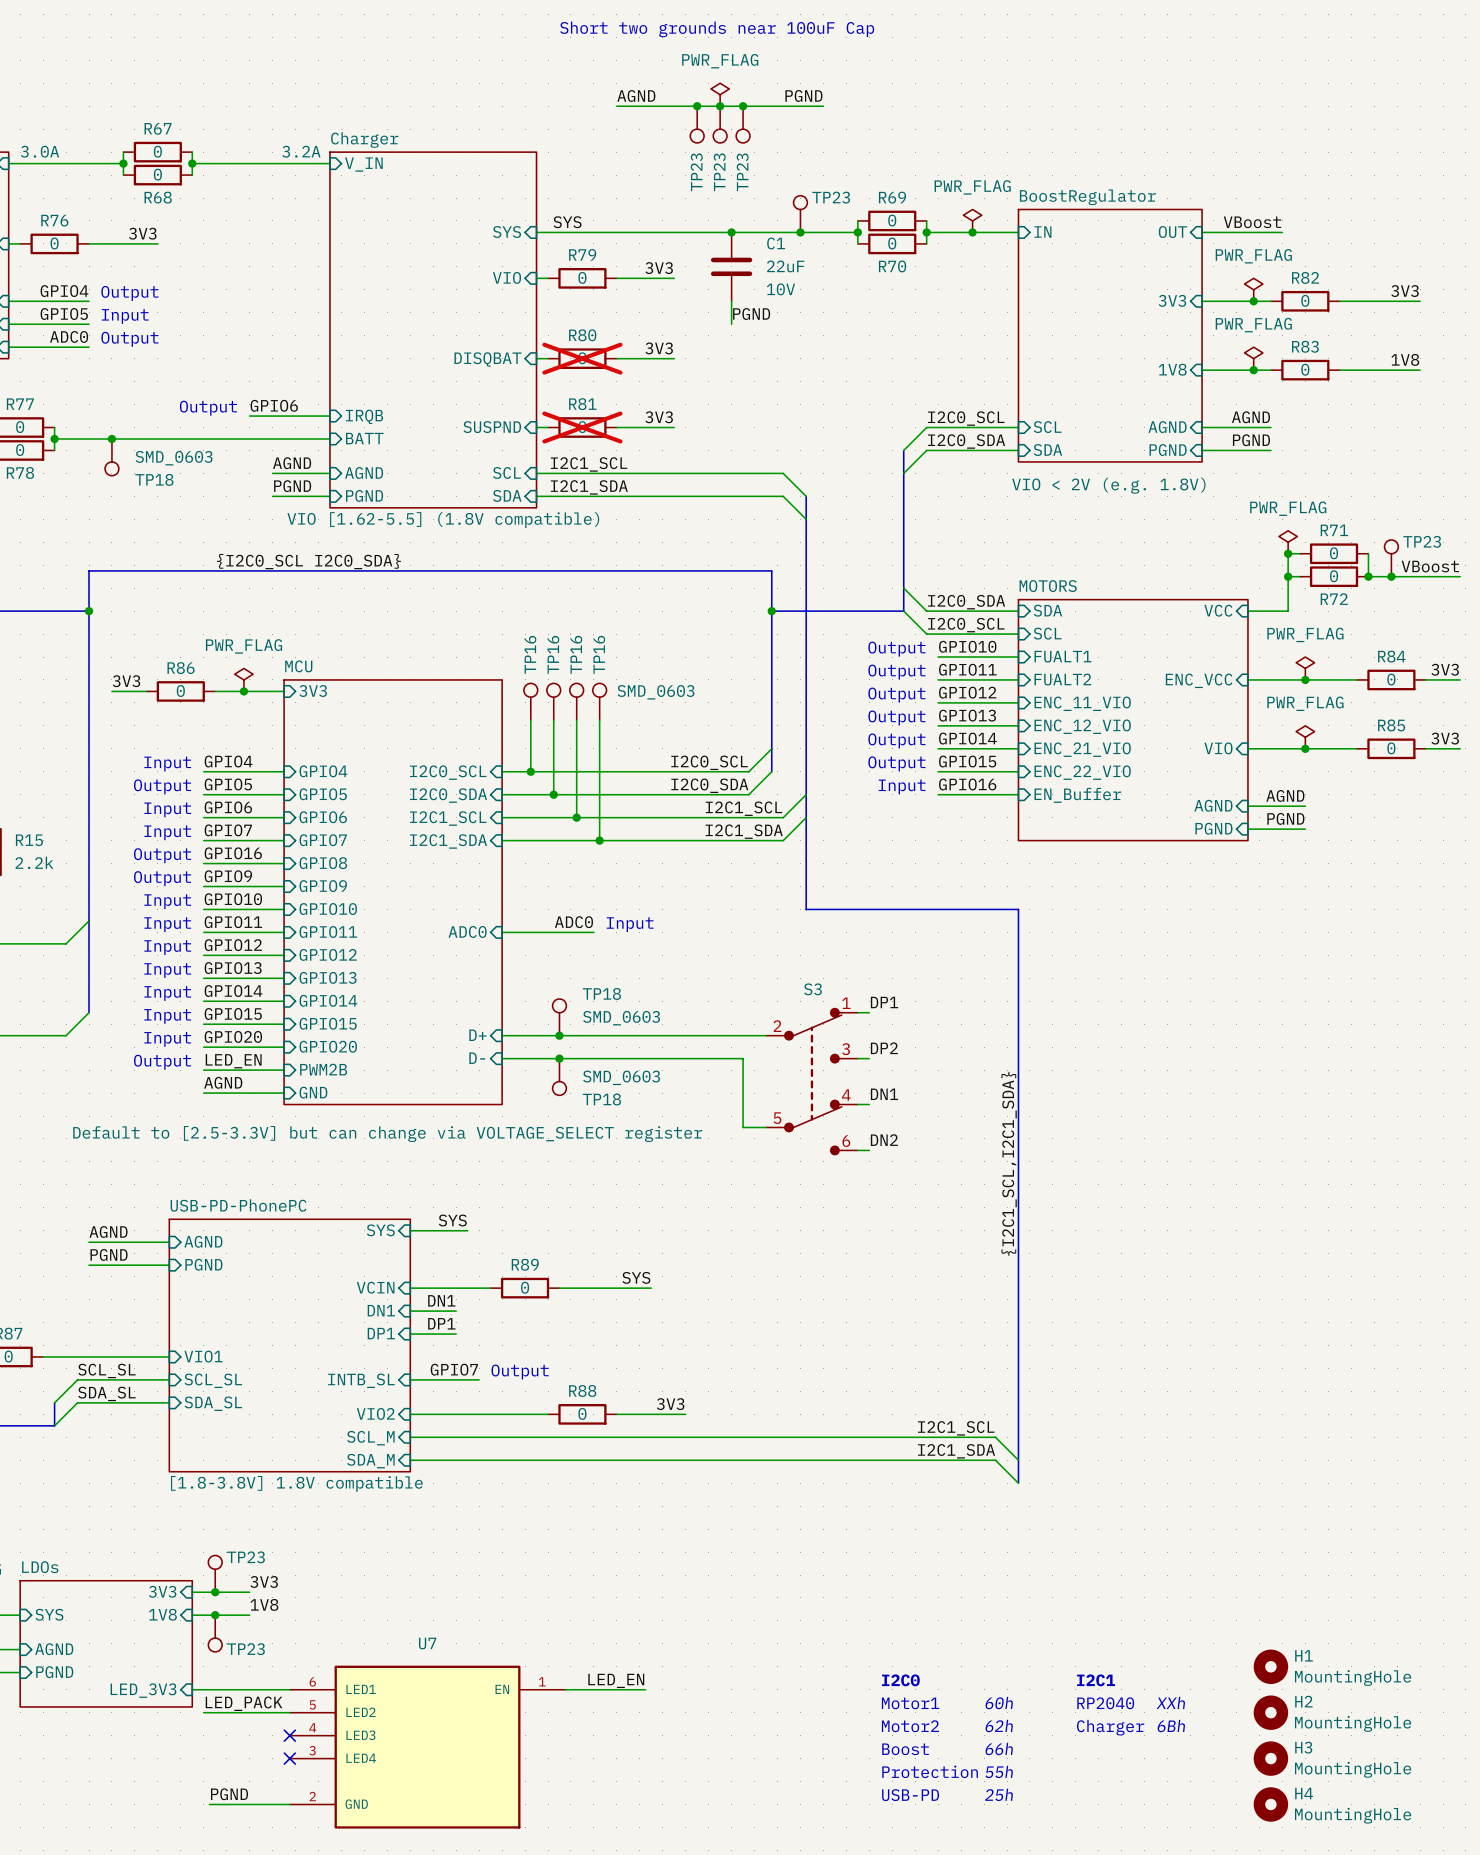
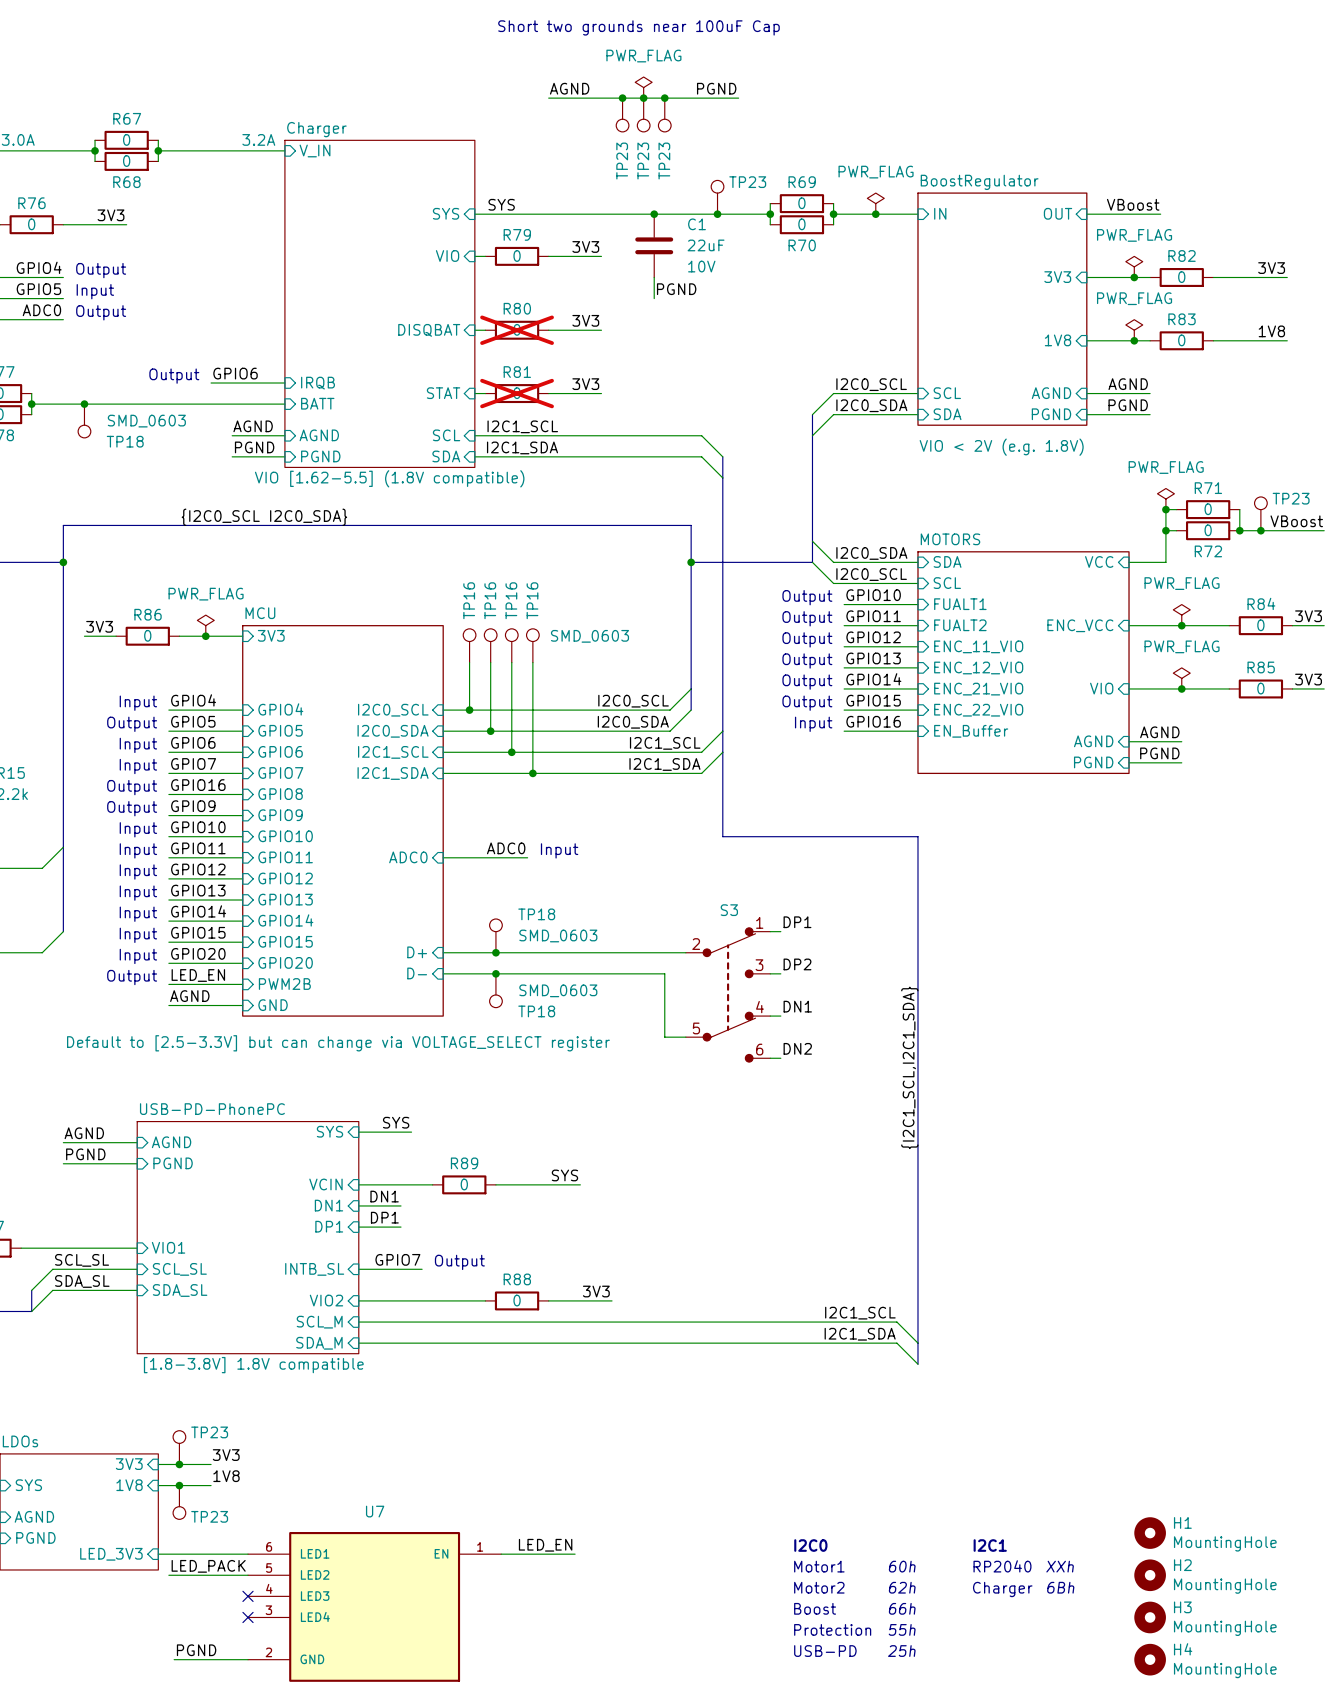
sheet pin: SUSPND (492, 427) -> STAT (443, 393)

